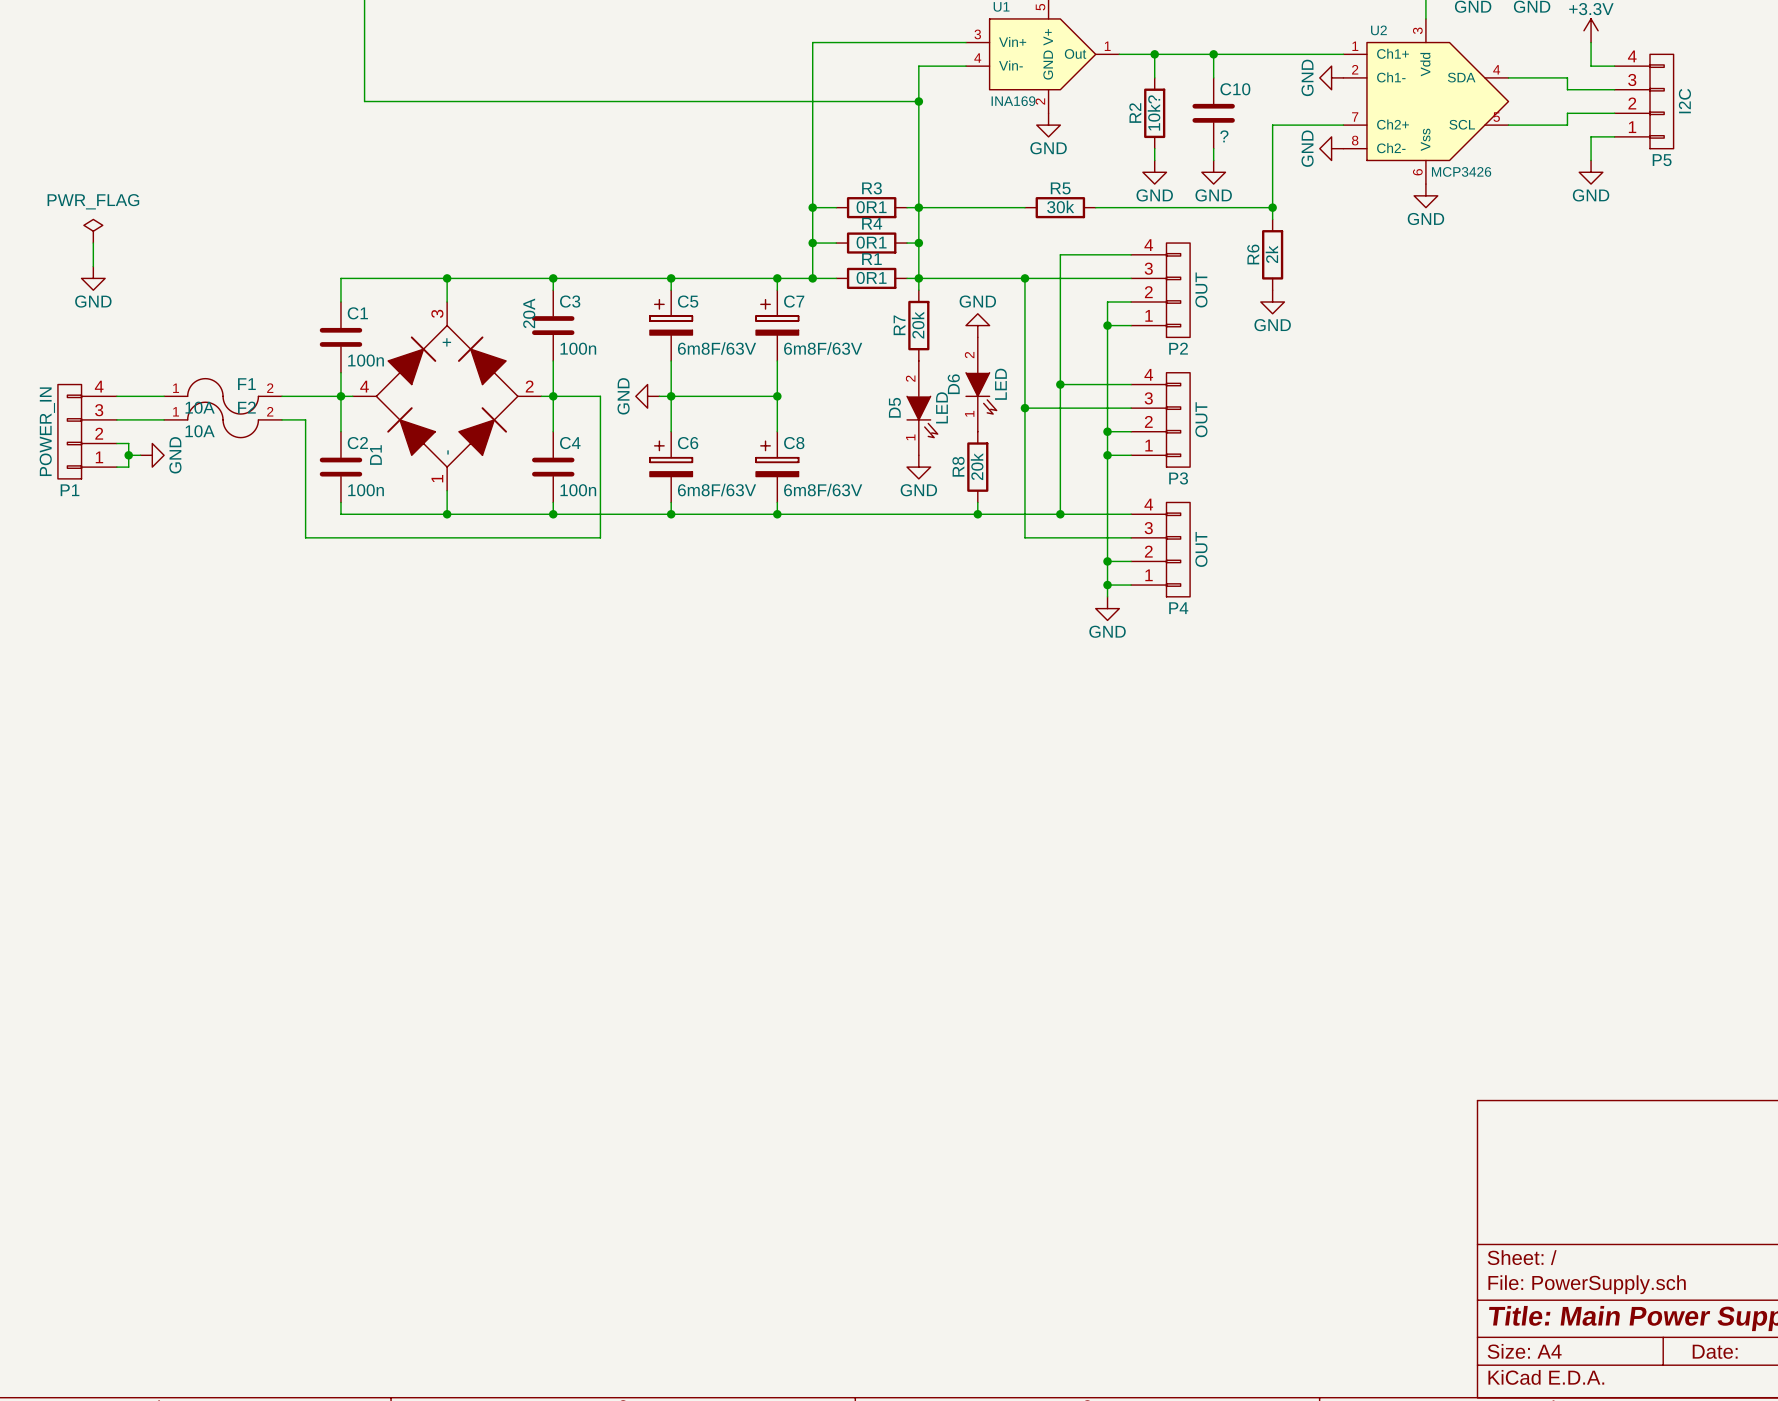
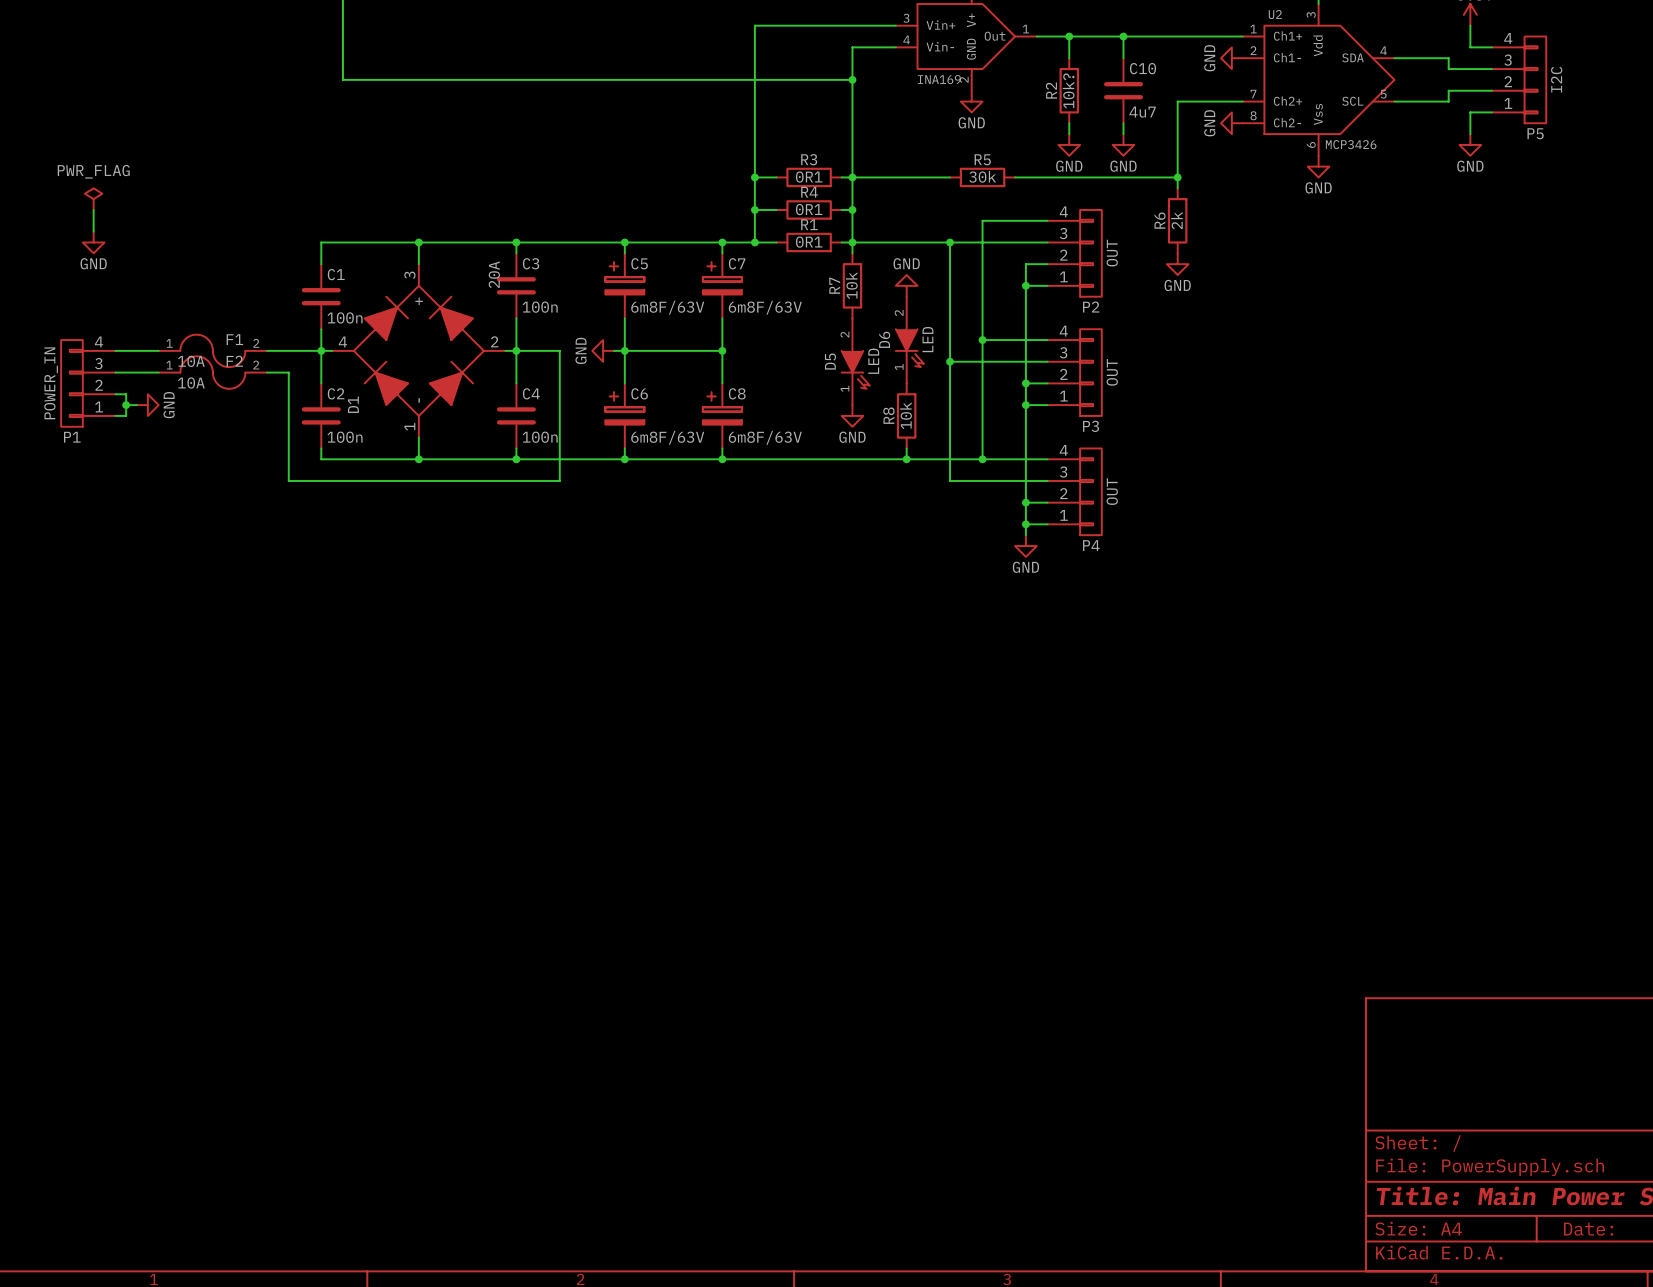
C10 value: ? (1224, 136) -> 4u7 (1142, 112)
R7 value: 20k (918, 325) -> 10k (851, 285)
R8 value: 20k (977, 466) -> 10k (906, 415)

